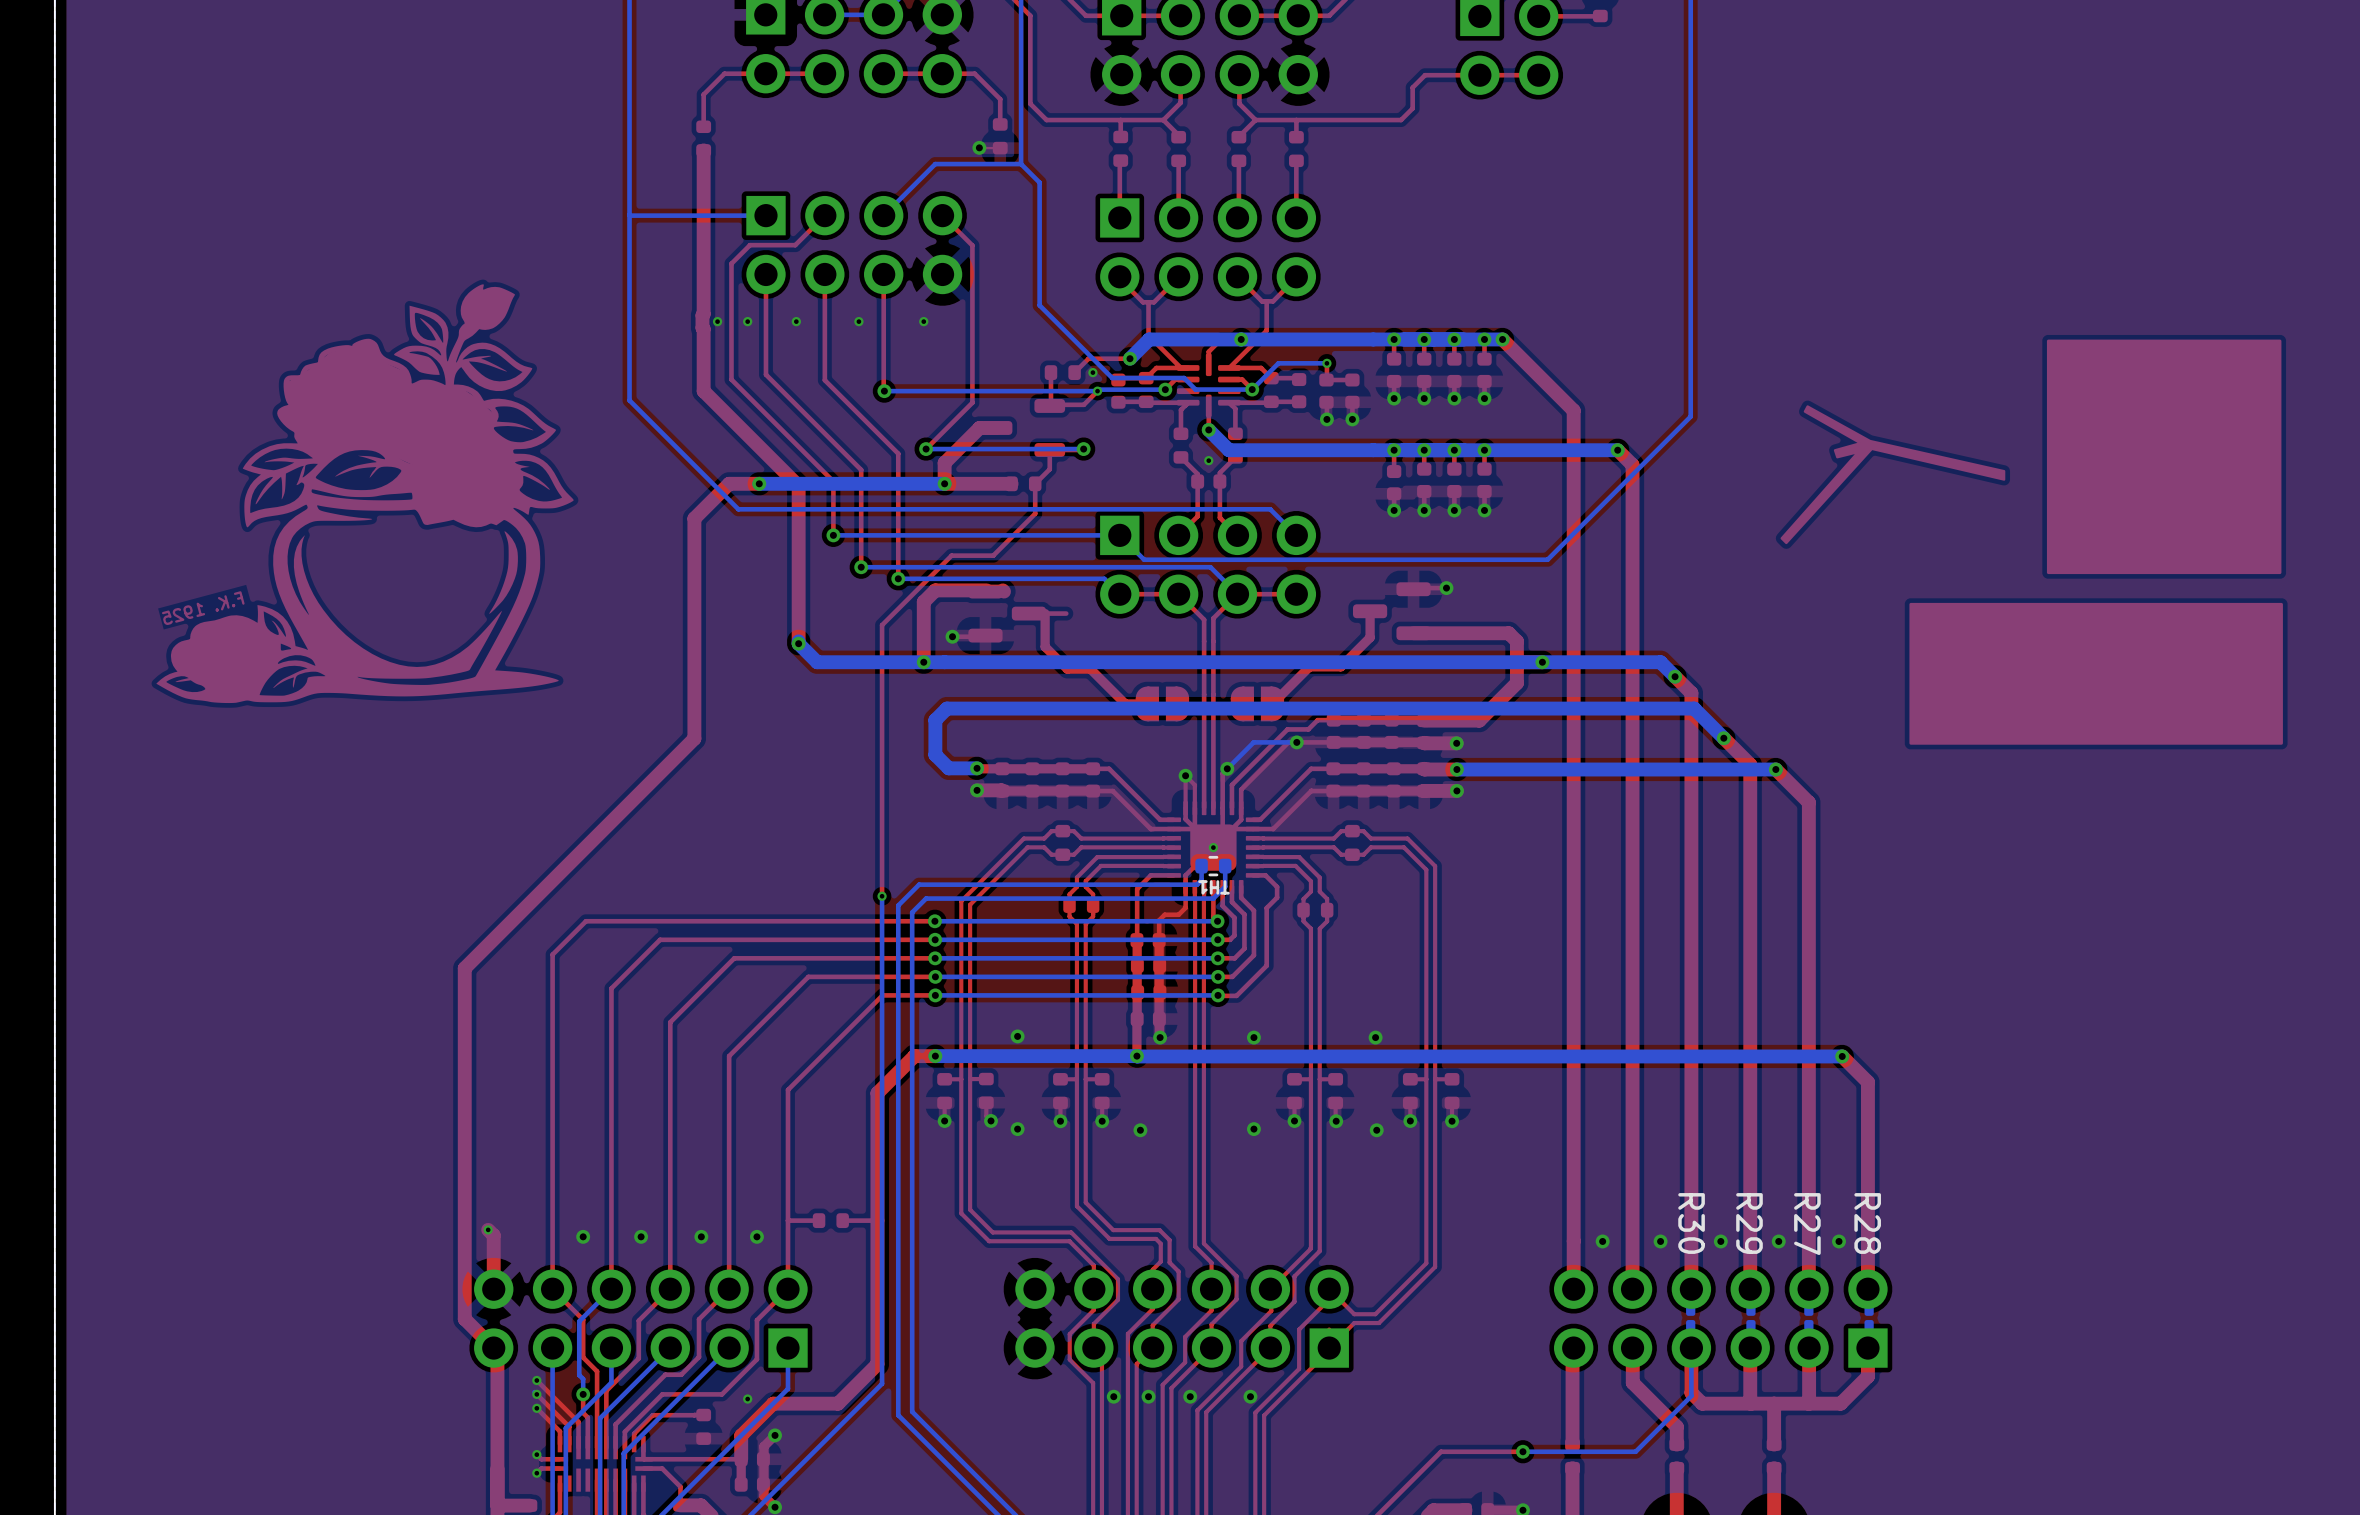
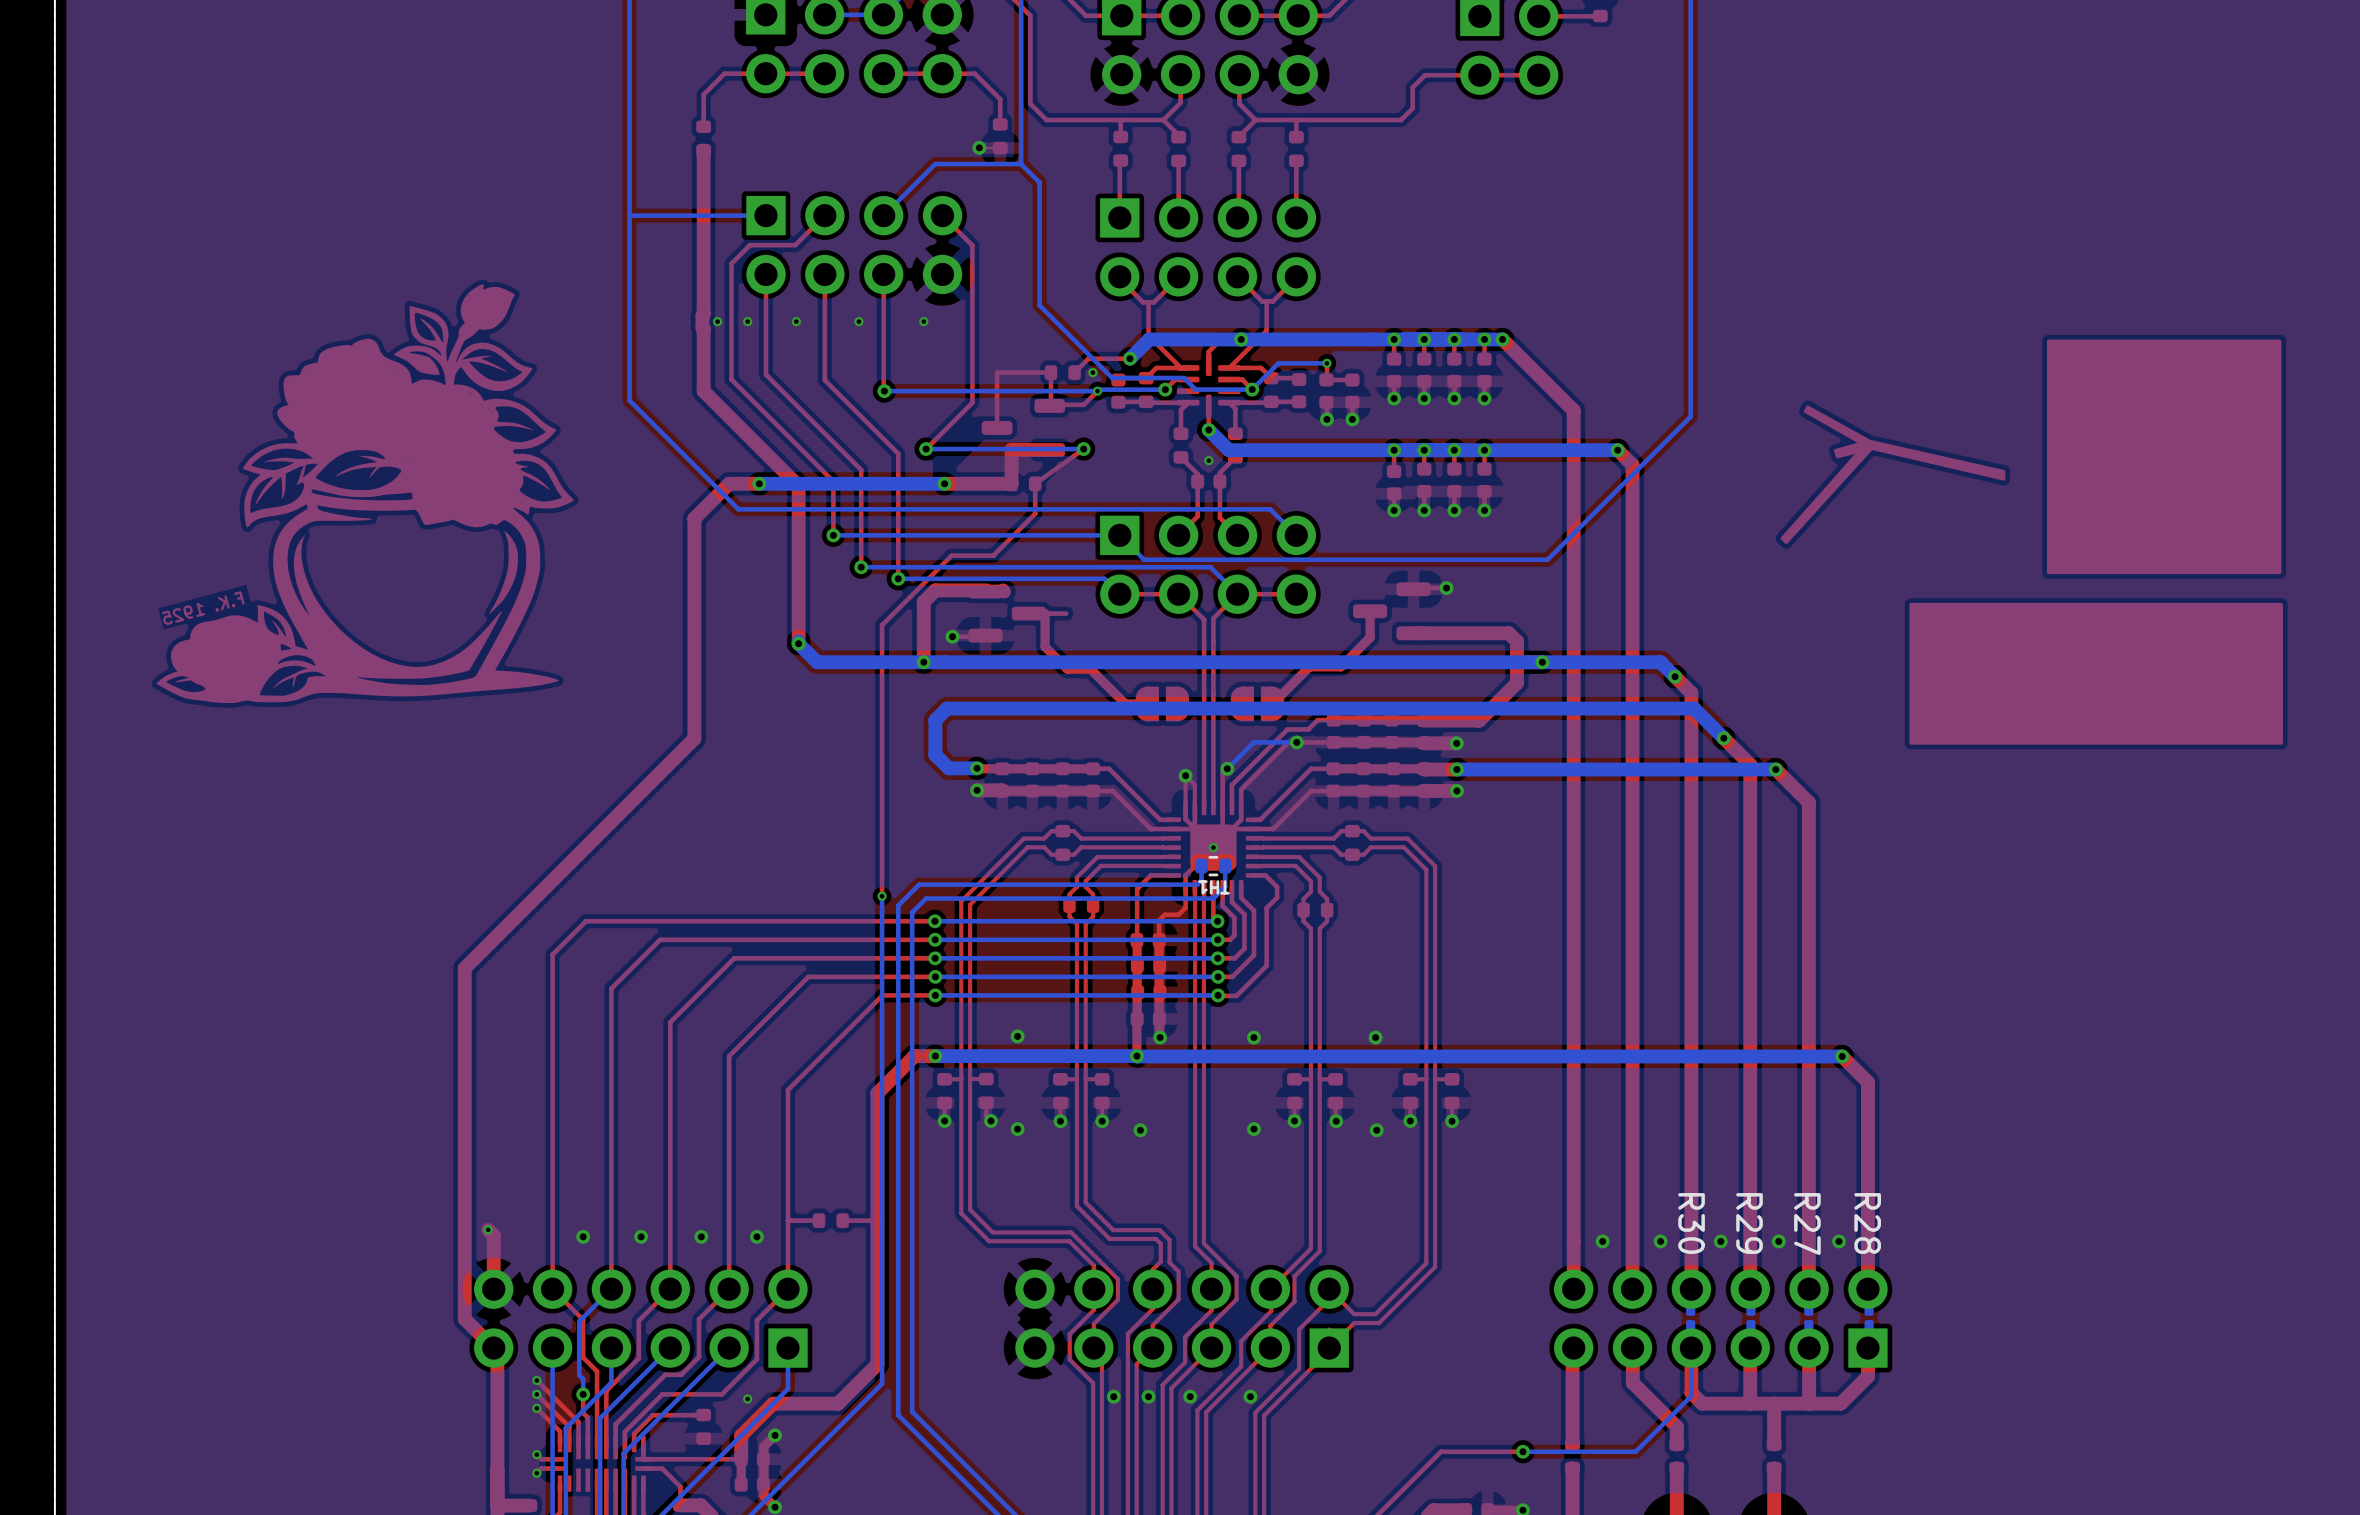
top track: none -> (1050, 372) (997, 372) (997, 427)
top track: (995, 429) (997, 427) (979, 427) (944, 462) (944, 483) -> none
top track: none -> (1049, 449) (1011, 449) (1011, 483)
top track: (1082, 449) (1049, 449) (1049, 469) (1035, 483) -> (1083, 449) (1035, 483)

